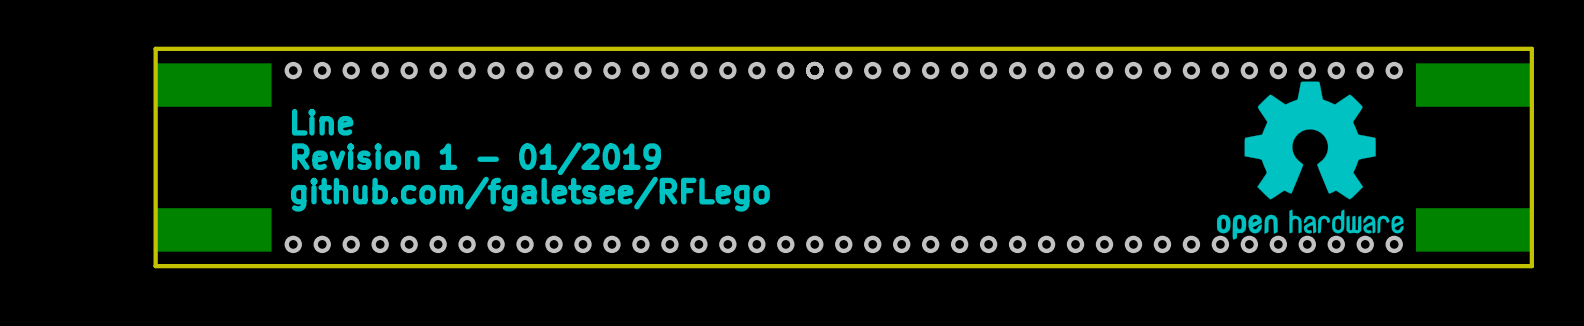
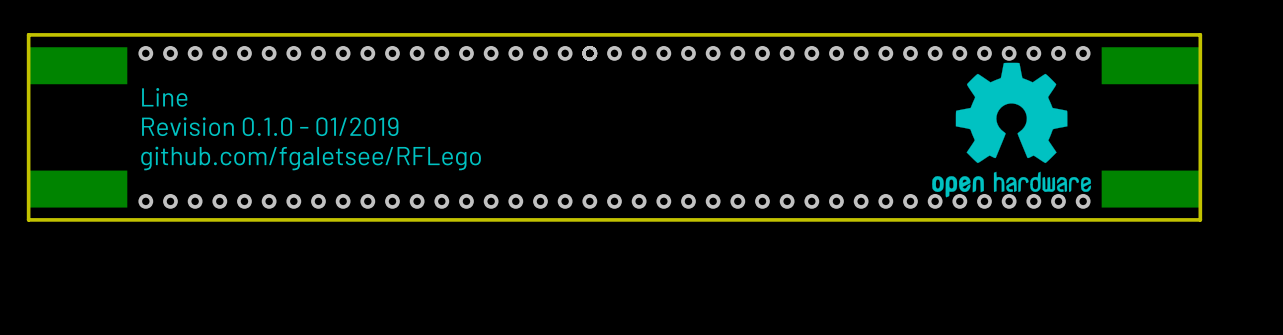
text: Revision 1 - 01/2019 (476, 158) -> Revision 0.1.0 - 01/2019 (270, 126)

